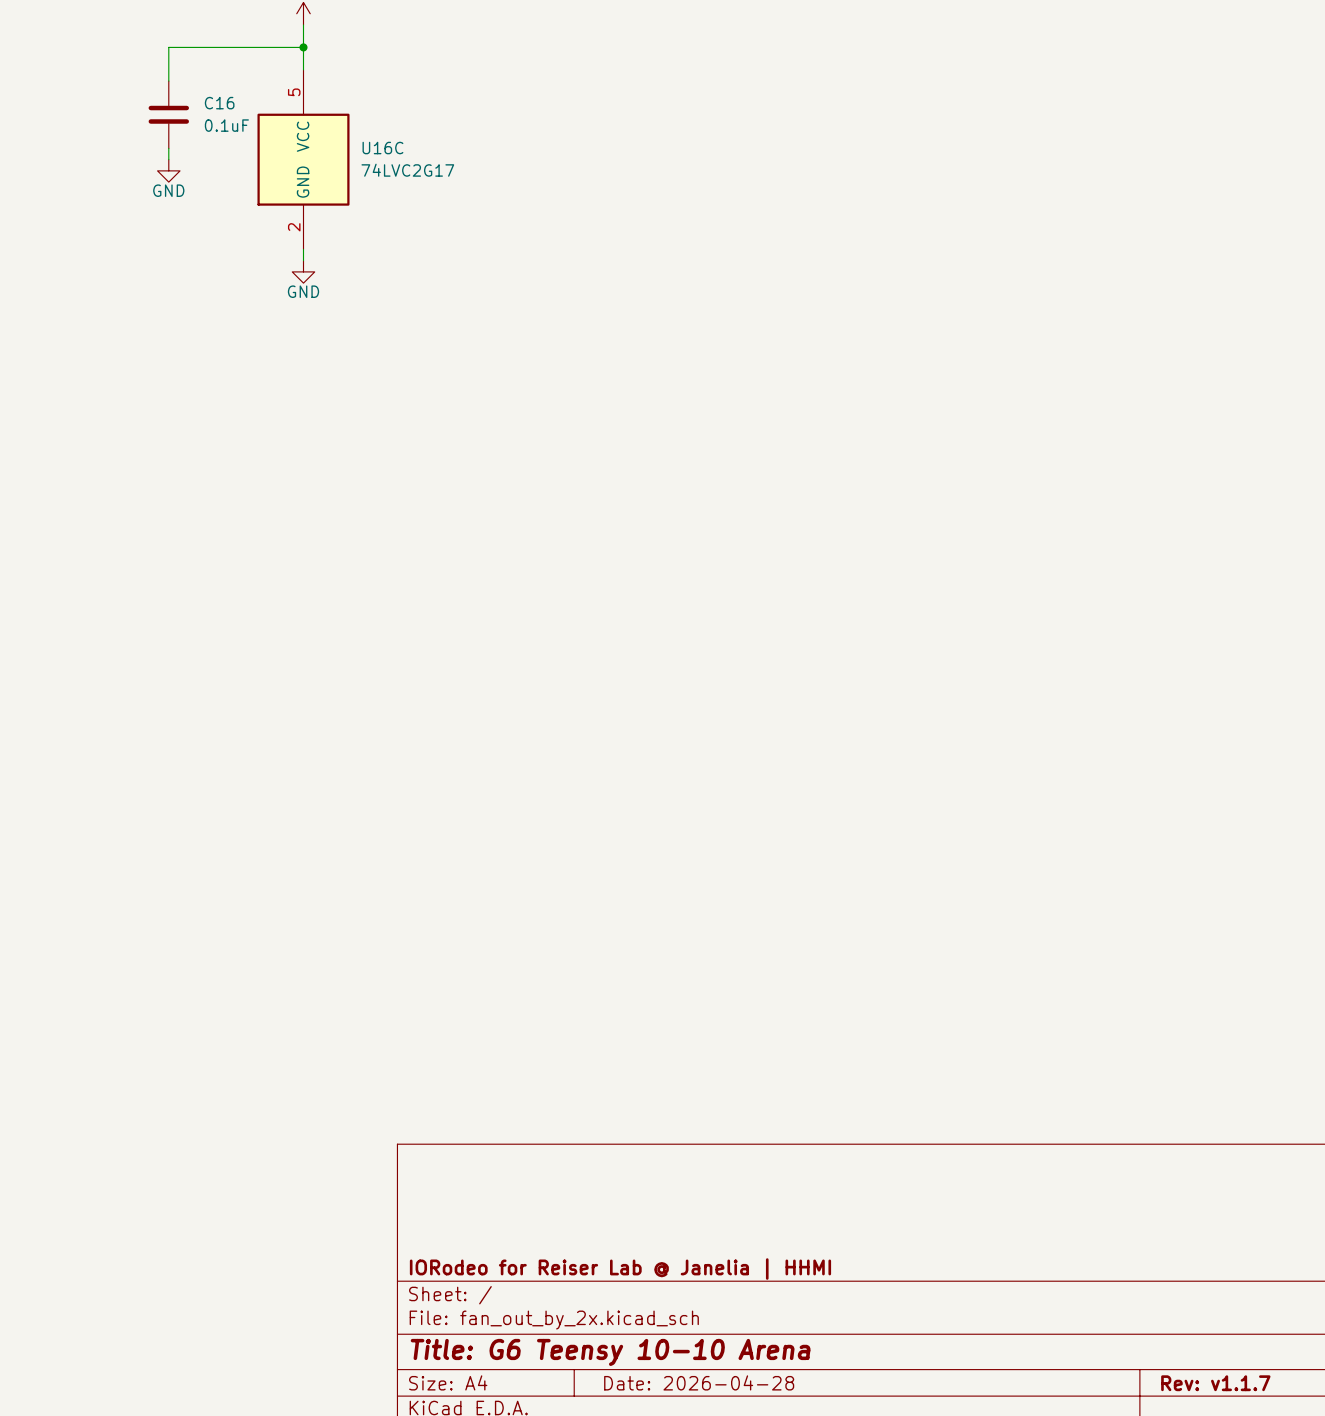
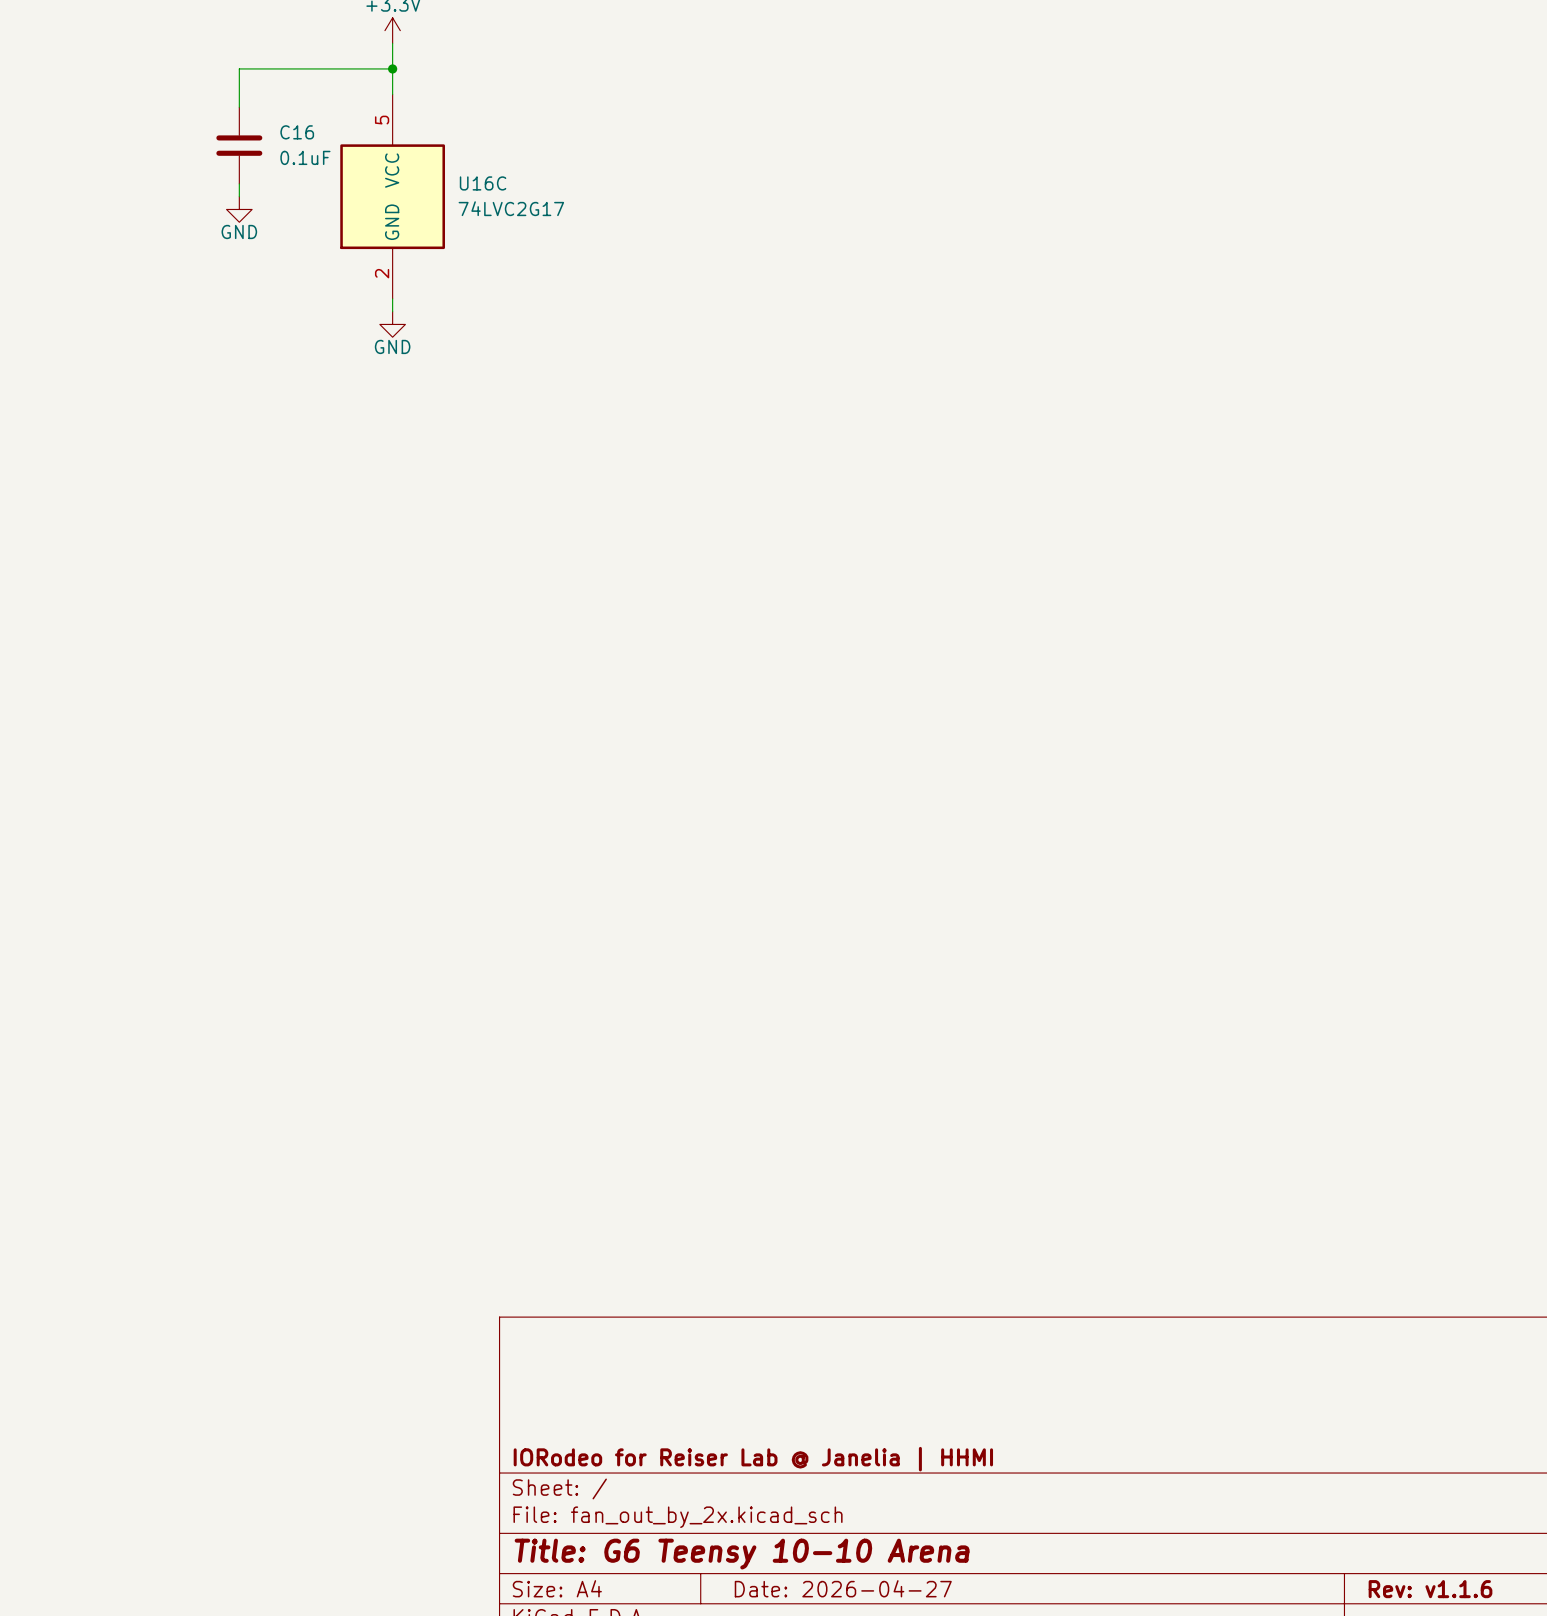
title block: Date: 2026-04-28 (699, 1382) -> Date: 2026-04-27 (843, 1588)
title block: Rev: v1.1.7 (1215, 1383) -> Rev: v1.1.6 (1430, 1589)

